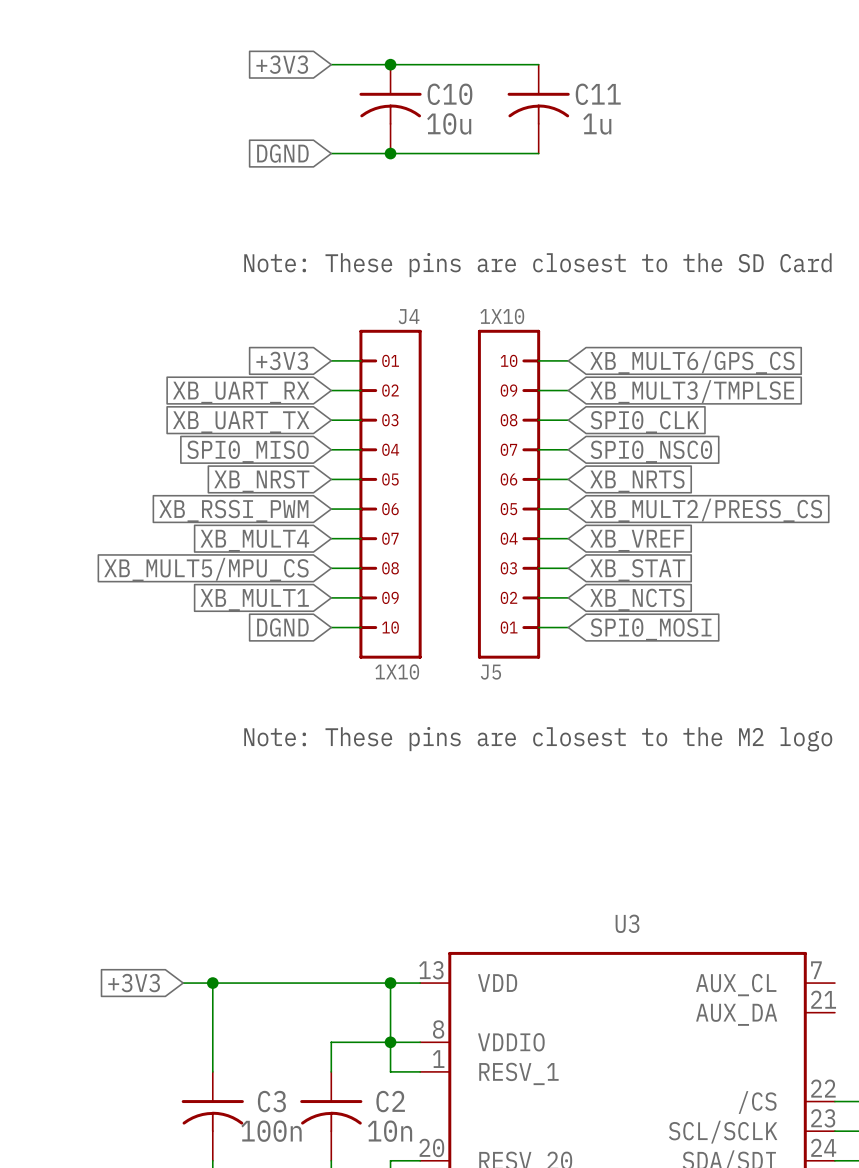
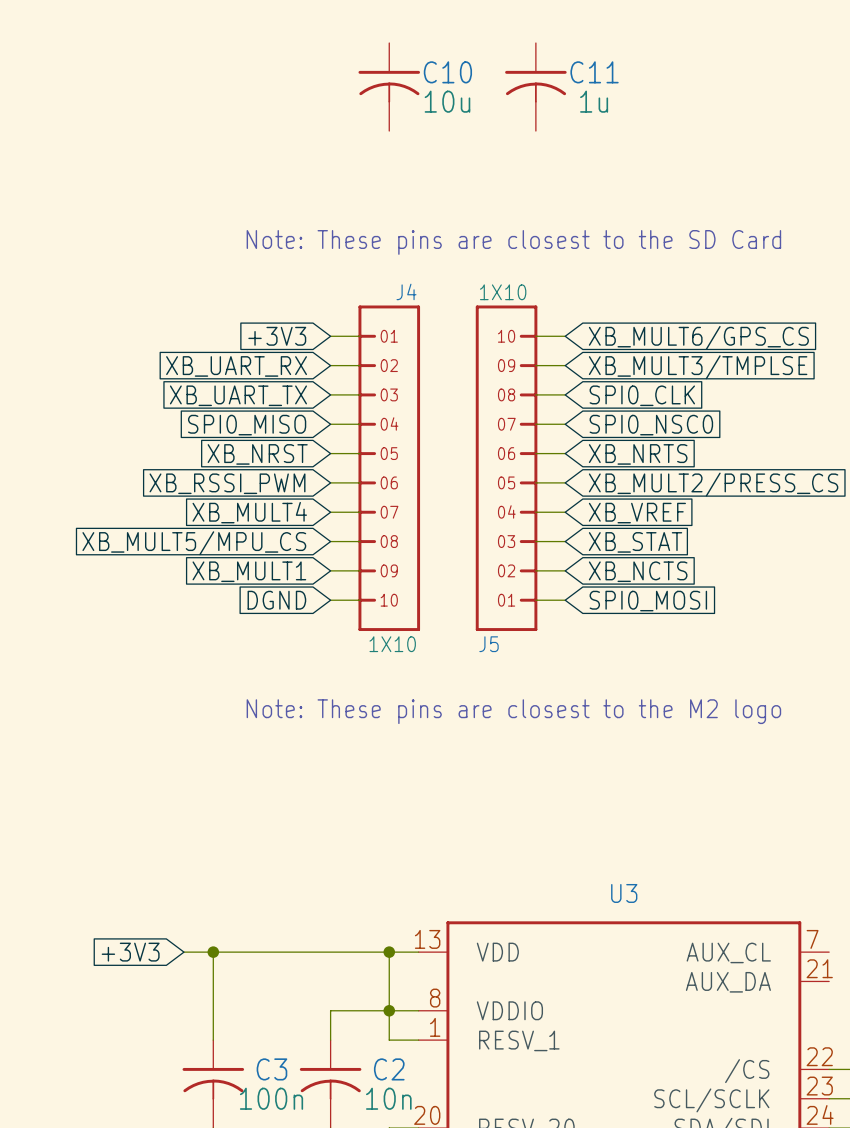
global label: +3V3 (282, 64) -> none
wire: (331, 64) (538, 64) -> none
junction: (390, 64) -> none
global label: DGND (282, 153) -> none
wire: (331, 153) (538, 153) -> none
junction: (390, 153) -> none

